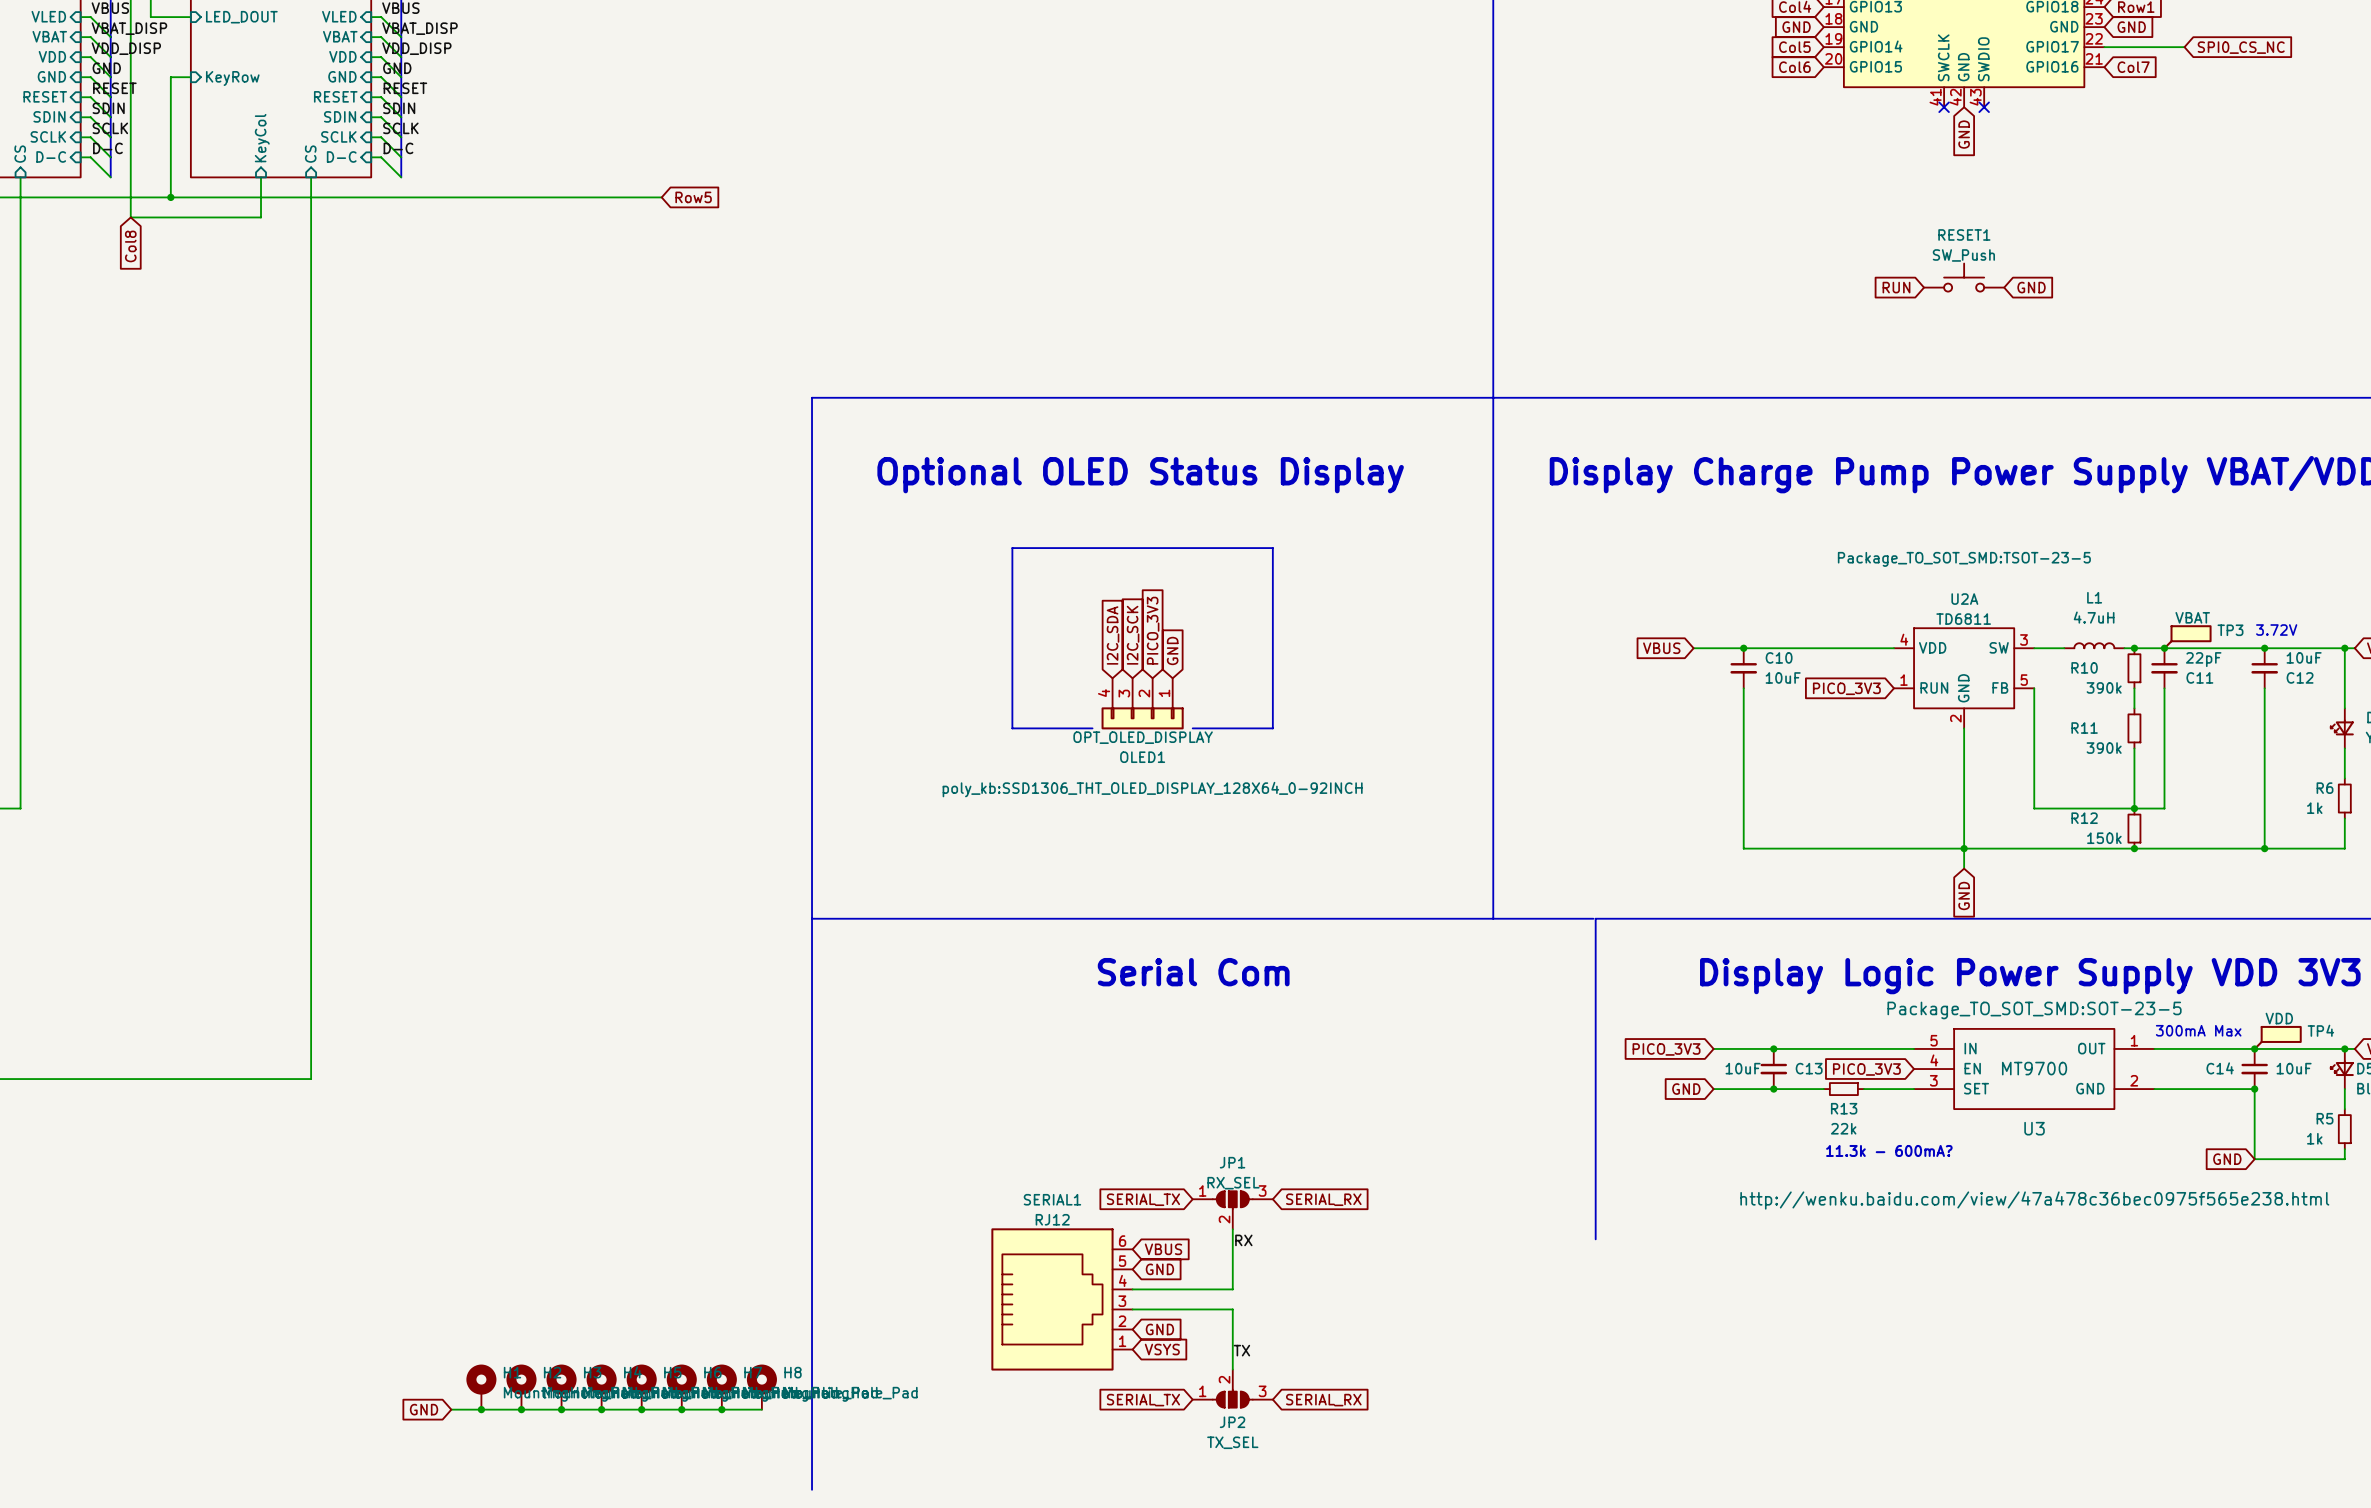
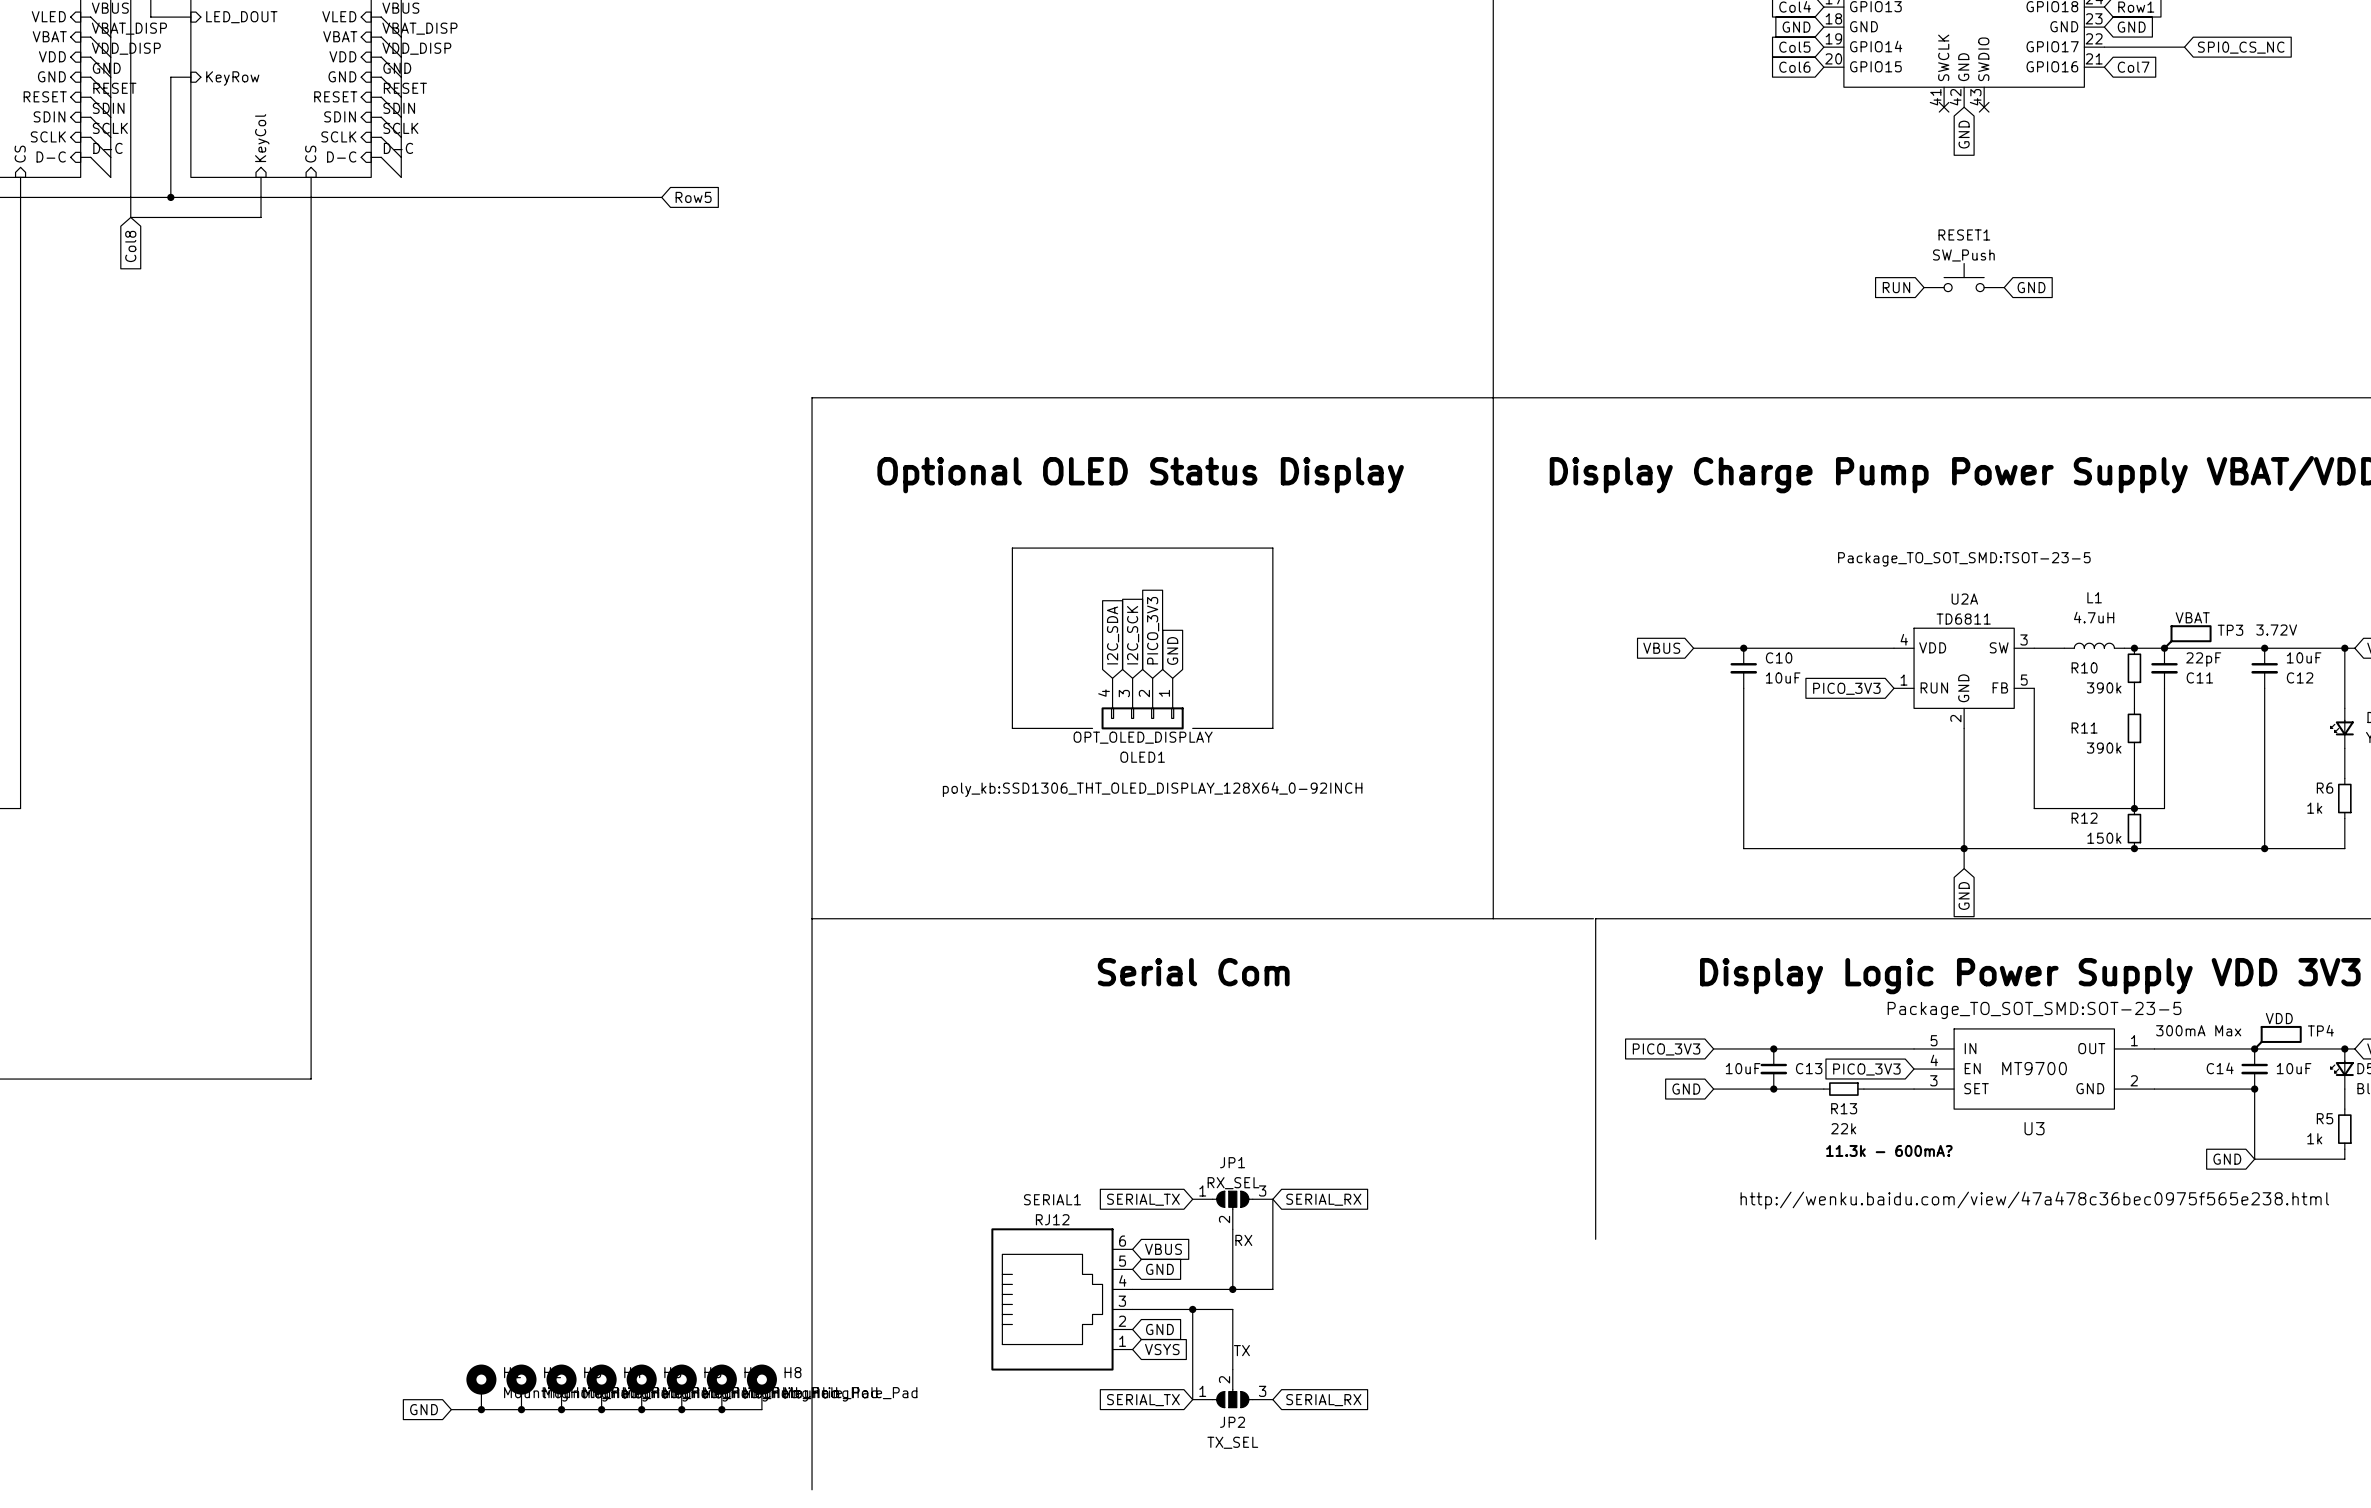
wire: none -> (1272, 1199) (1272, 1289) (1232, 1289)
junction: none -> (1232, 1289)
wire: none -> (1192, 1309) (1192, 1399)
junction: none -> (1192, 1309)

